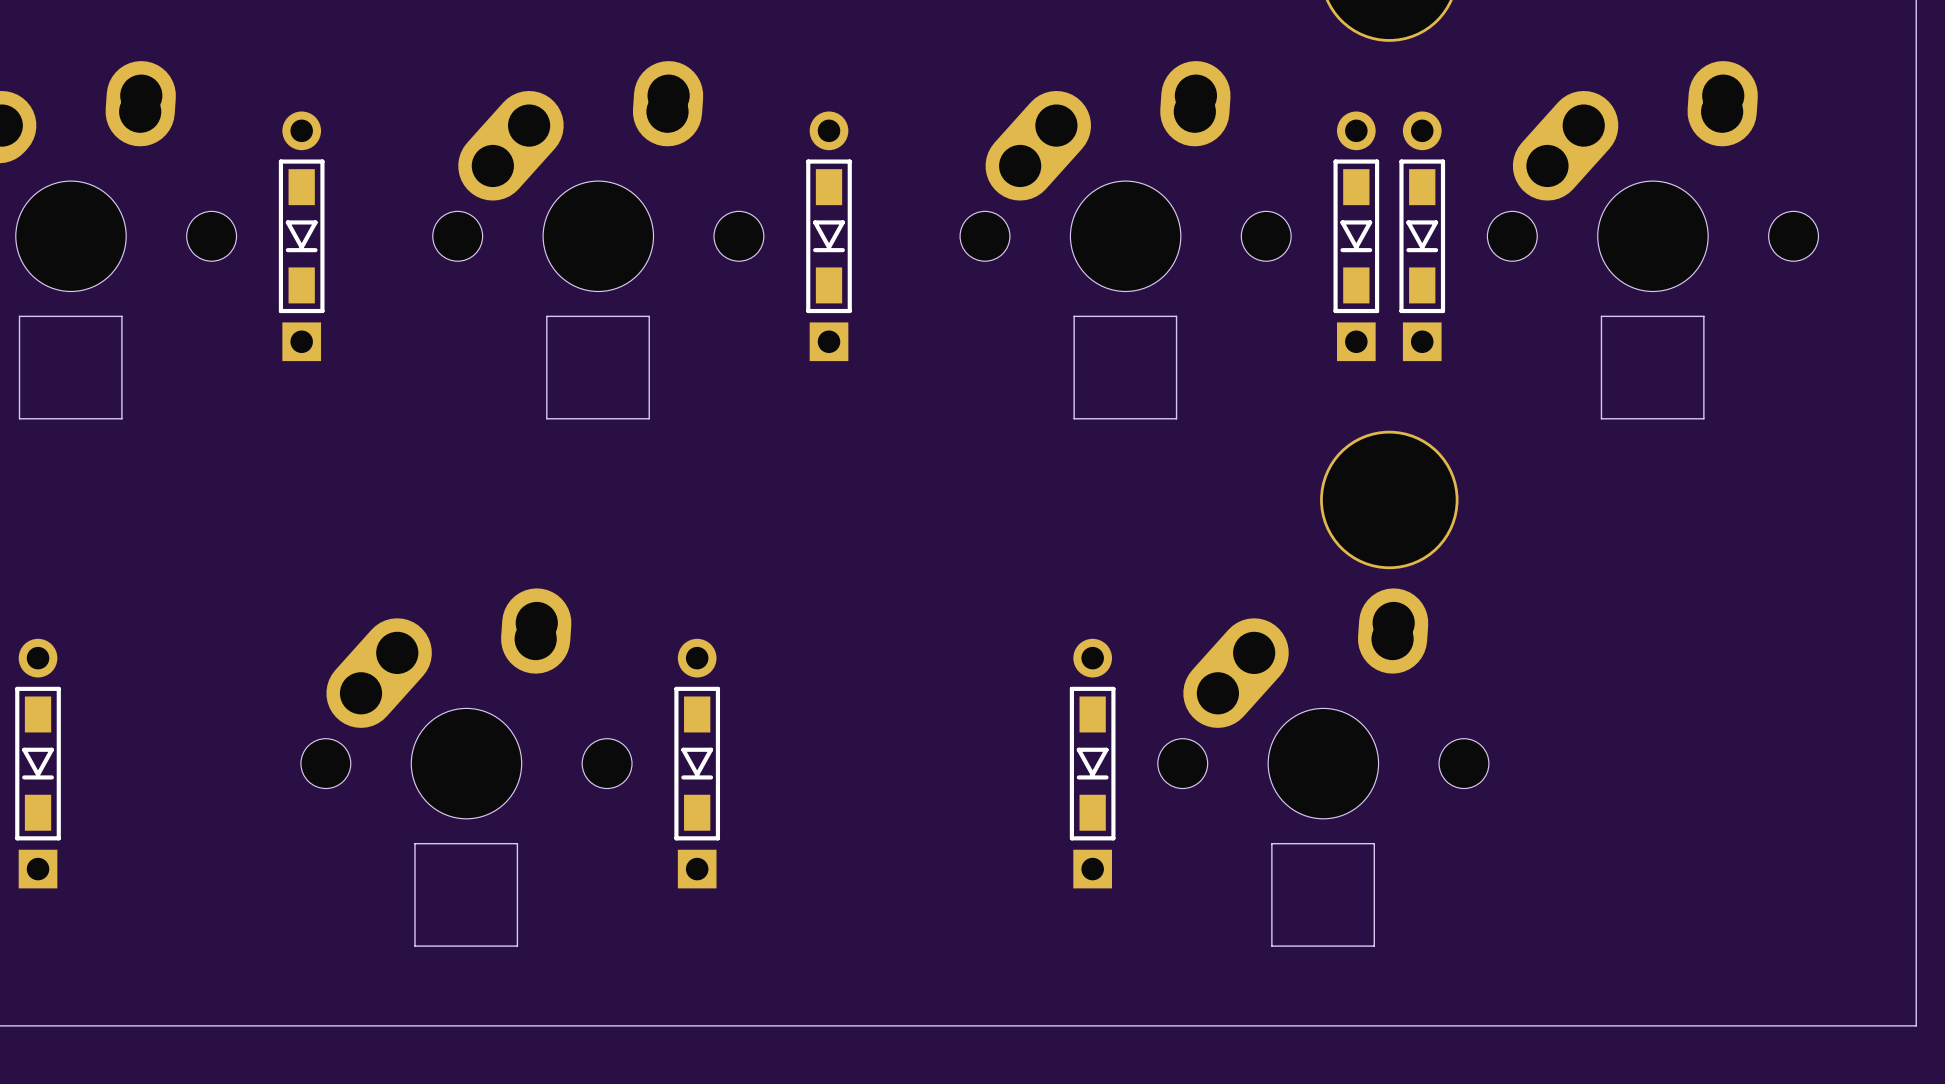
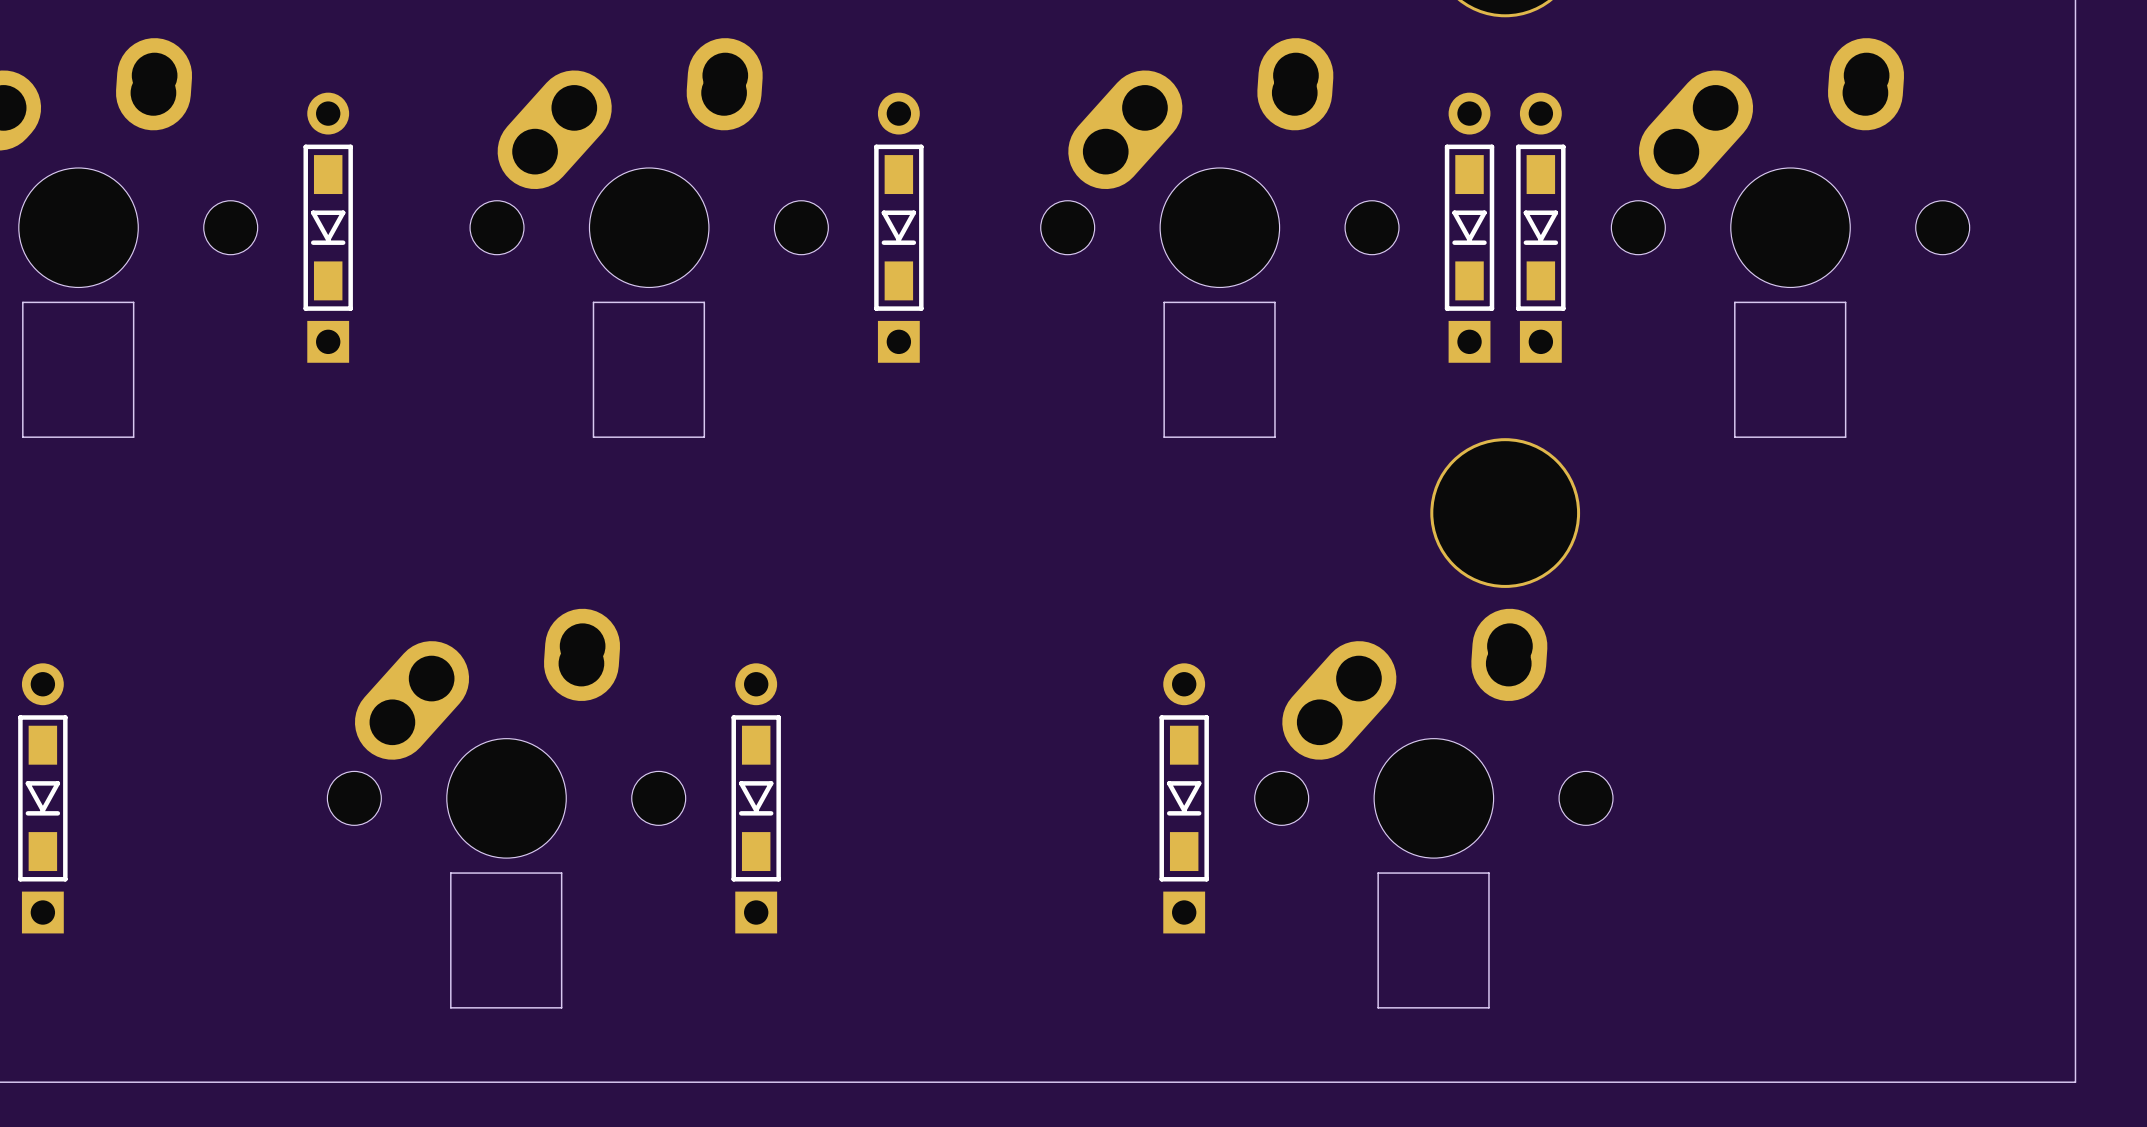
part footprint: [18, 315, 123, 420] -> [22, 301, 135, 438]
part footprint: [546, 315, 650, 420] -> [592, 301, 706, 438]
part footprint: [1073, 315, 1178, 420] -> [1163, 301, 1276, 438]
part footprint: [1600, 315, 1705, 420] -> [1734, 301, 1847, 438]
part footprint: [414, 842, 519, 947] -> [450, 872, 563, 1009]
part footprint: [1271, 842, 1375, 947] -> [1377, 872, 1490, 1009]

